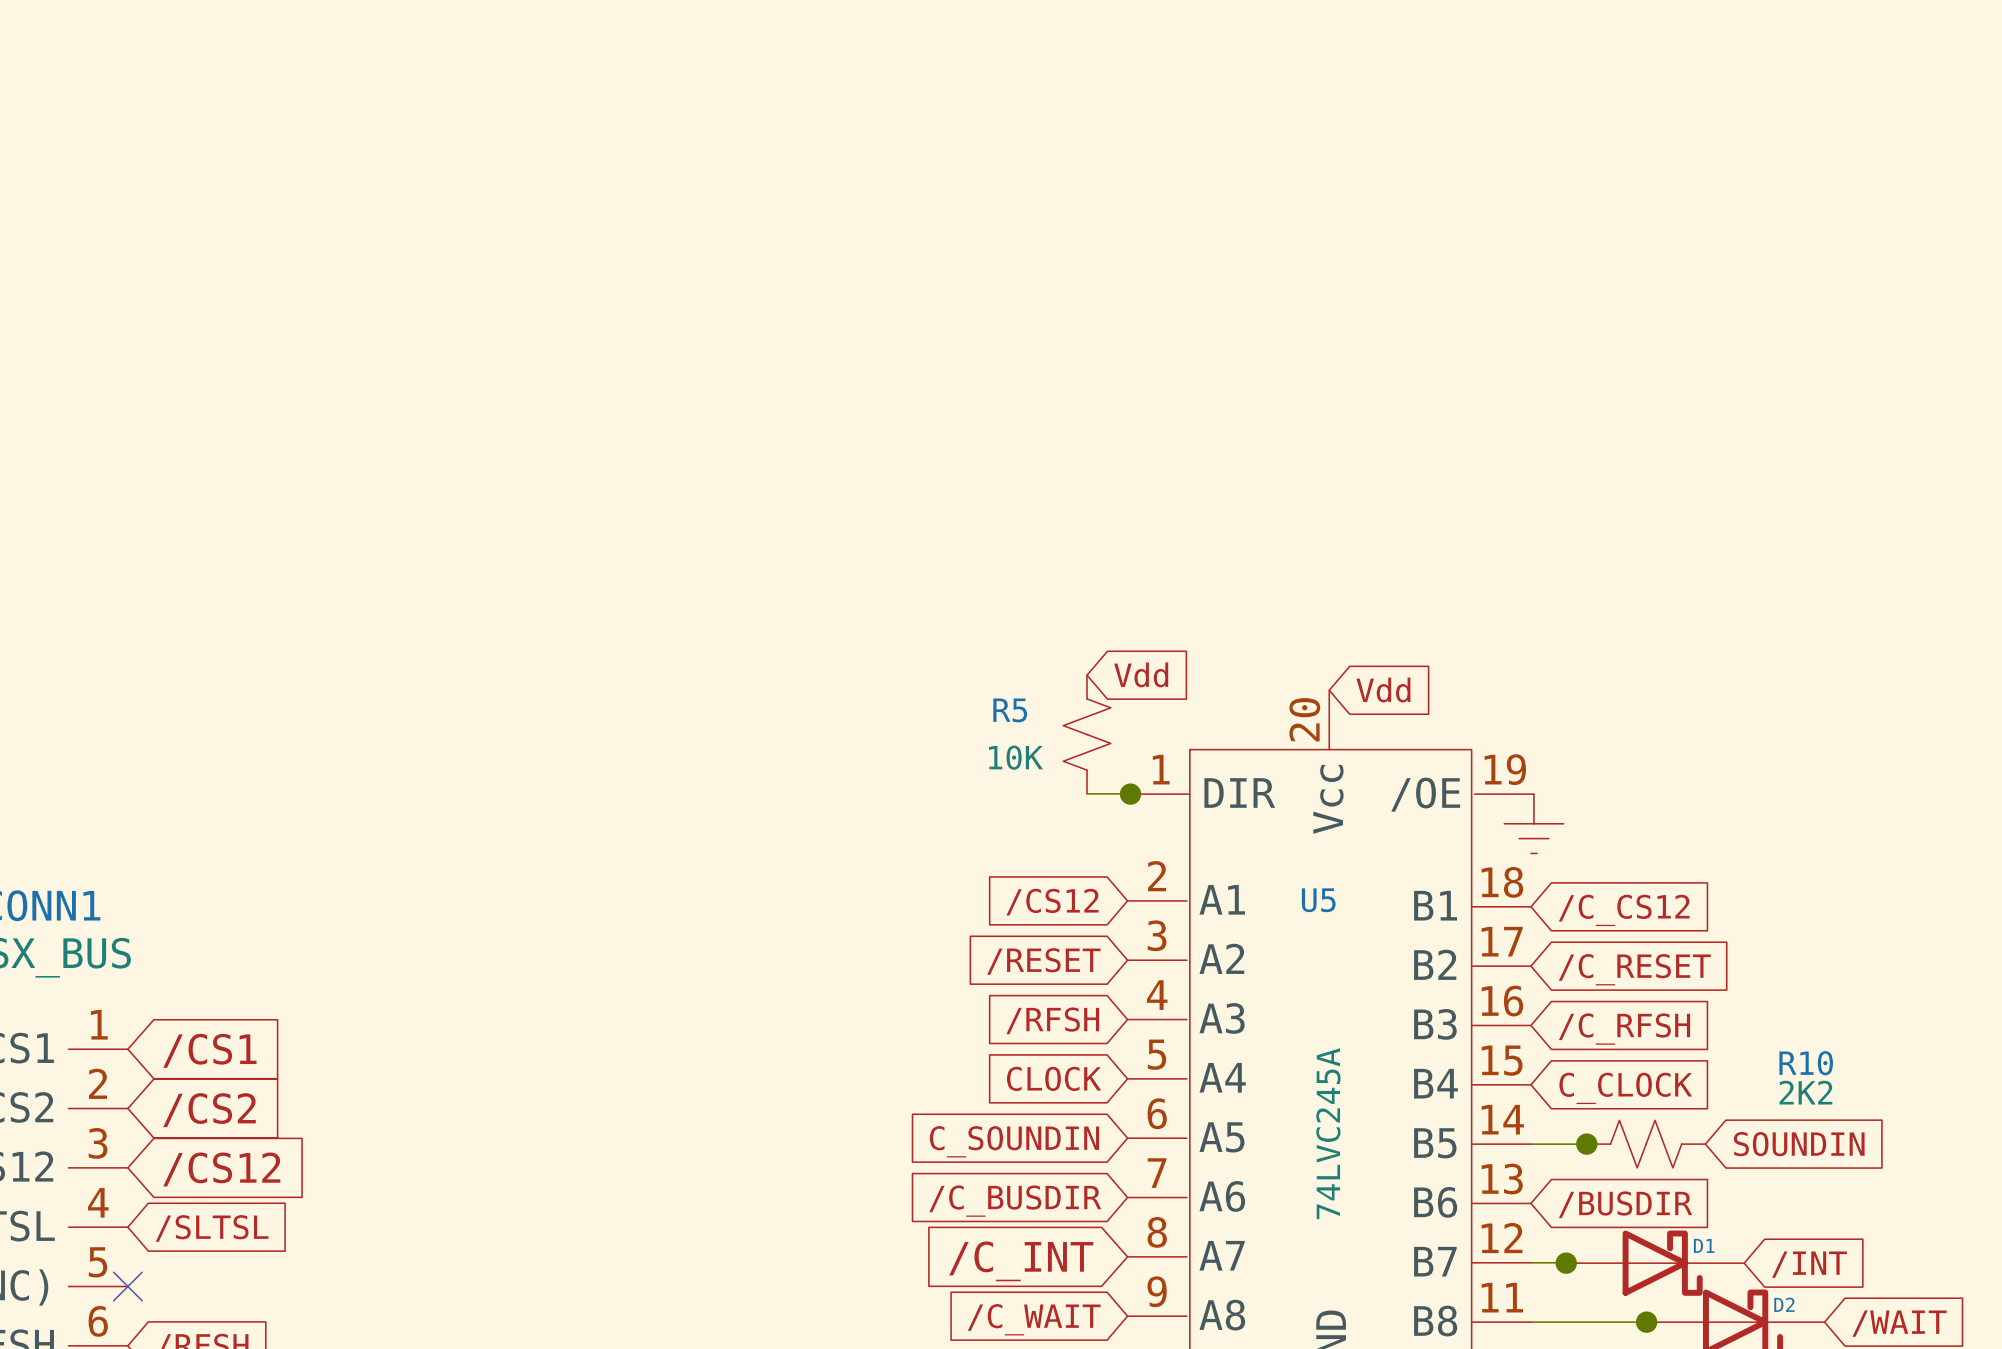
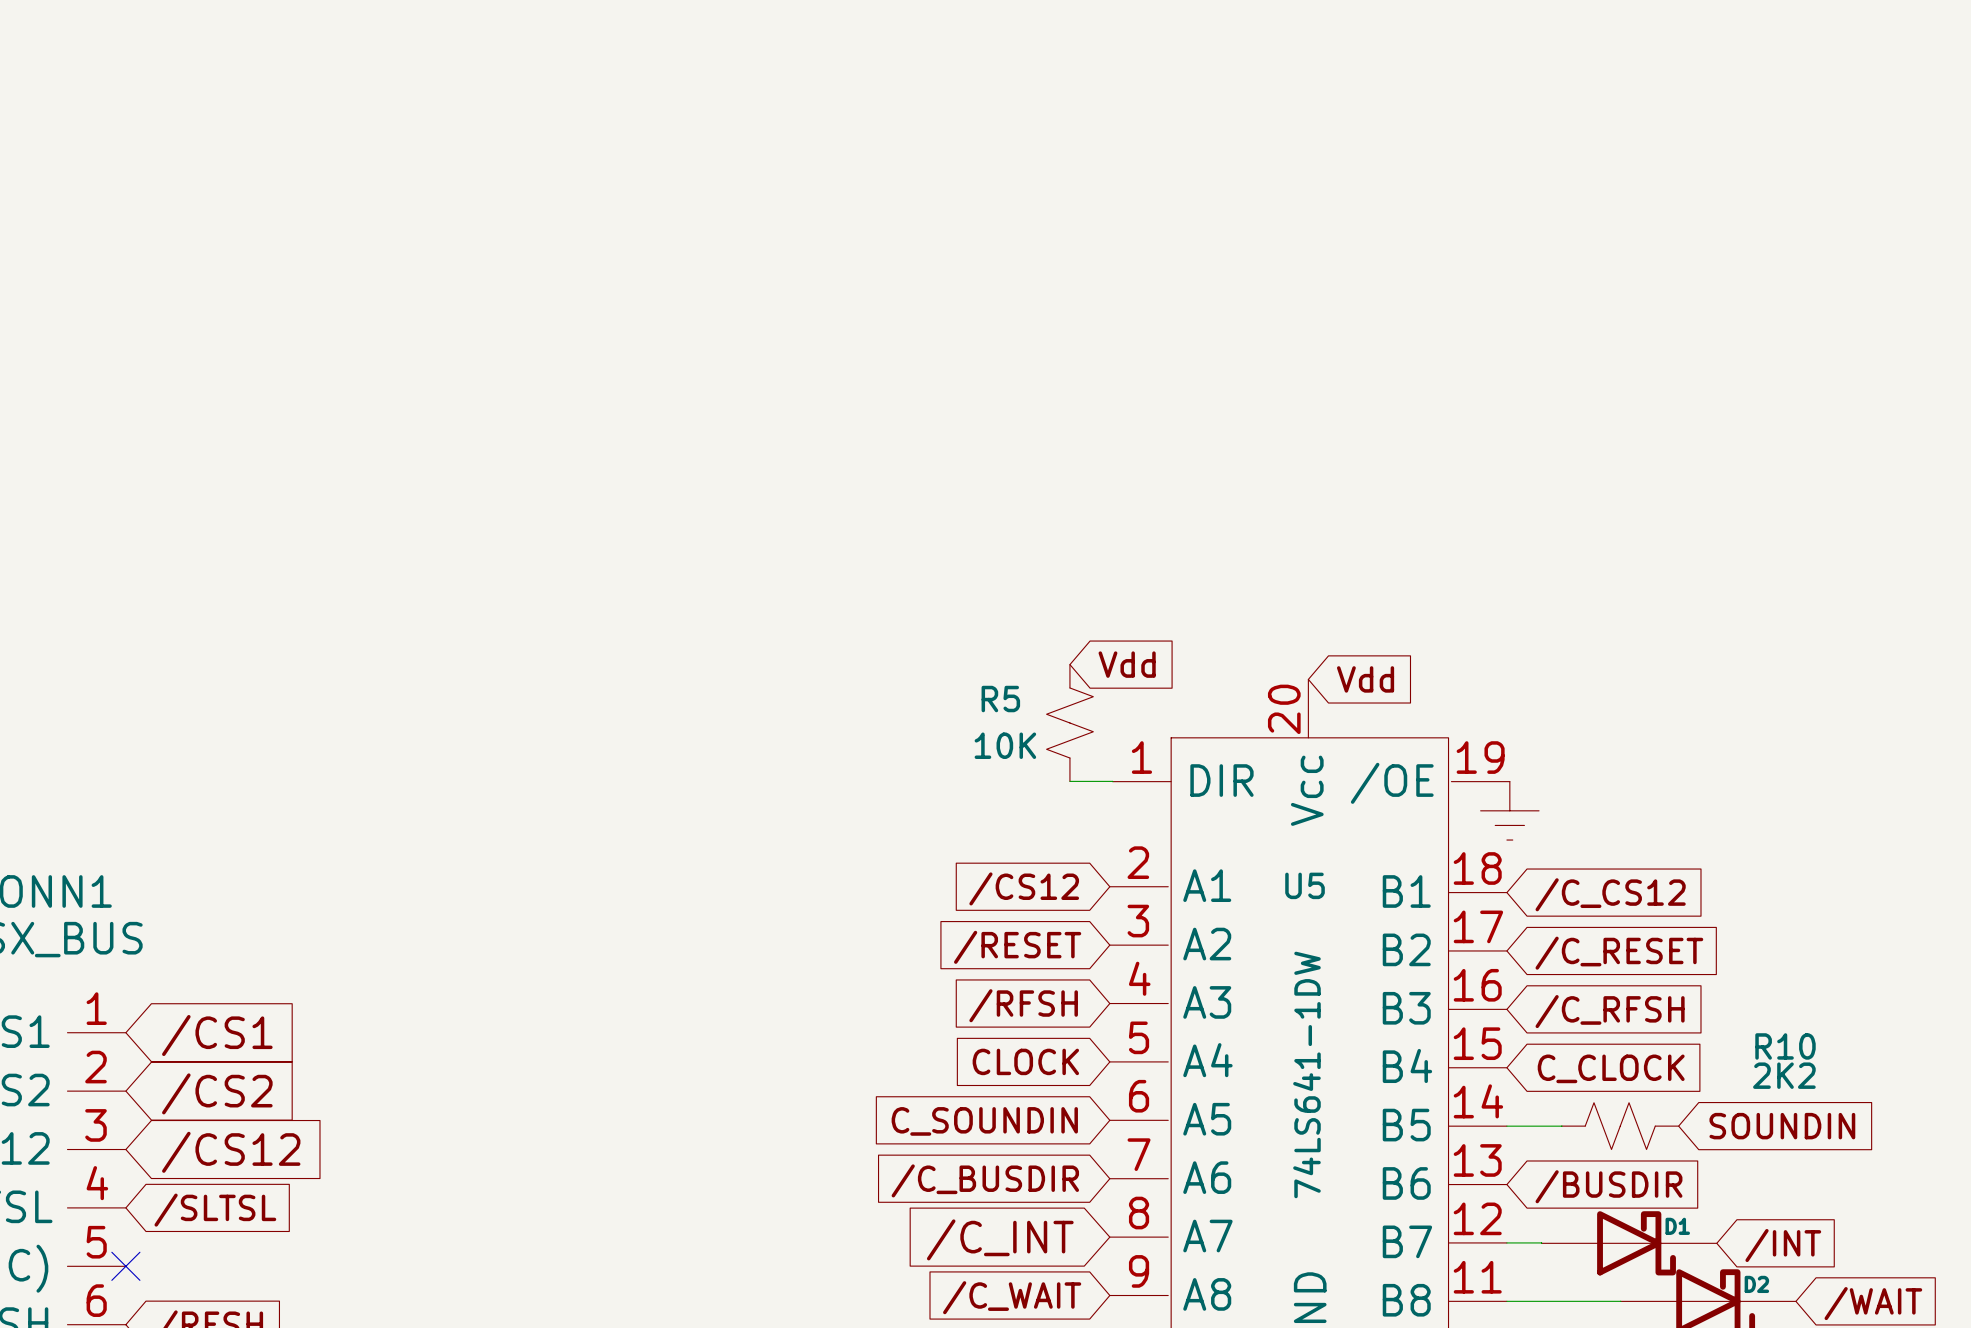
junction: (1130, 794) -> none
U5 value: 74LVC245A (1328, 1133) -> 74LS641-1DW (1306, 1074)
junction: (1586, 1144) -> none
junction: (1566, 1263) -> none
junction: (1646, 1322) -> none

